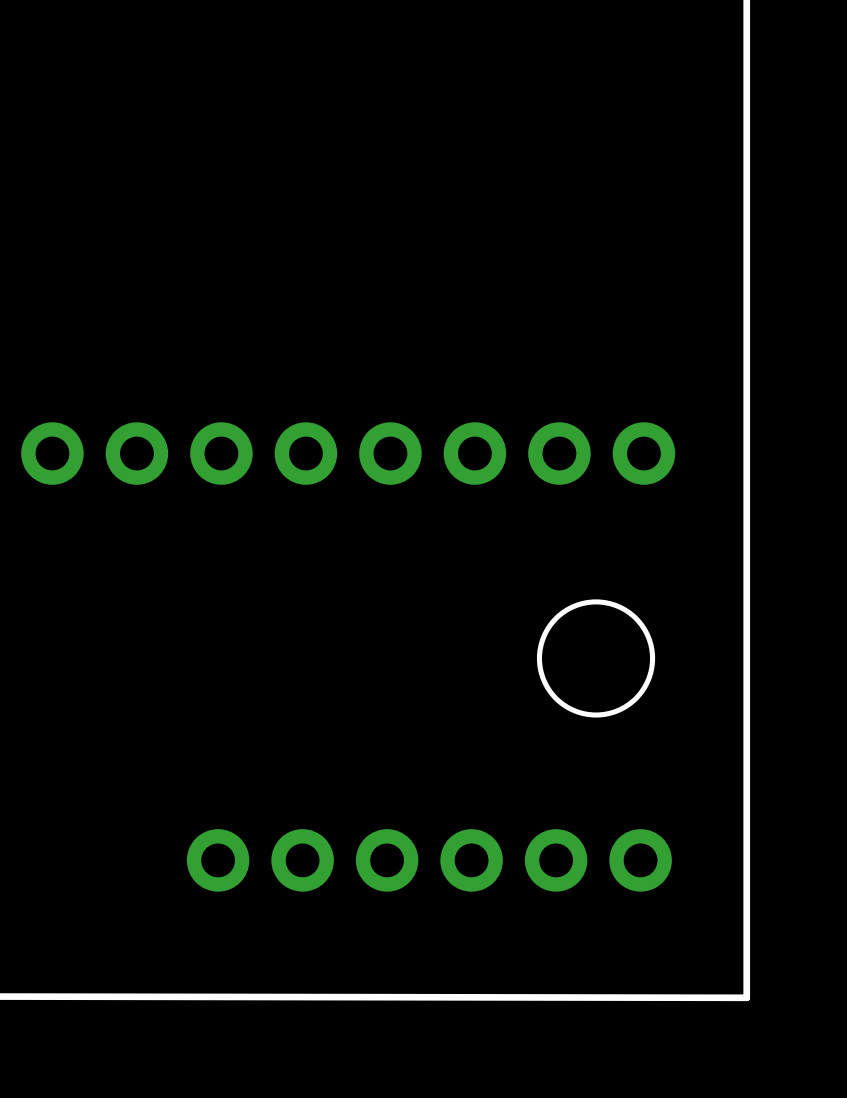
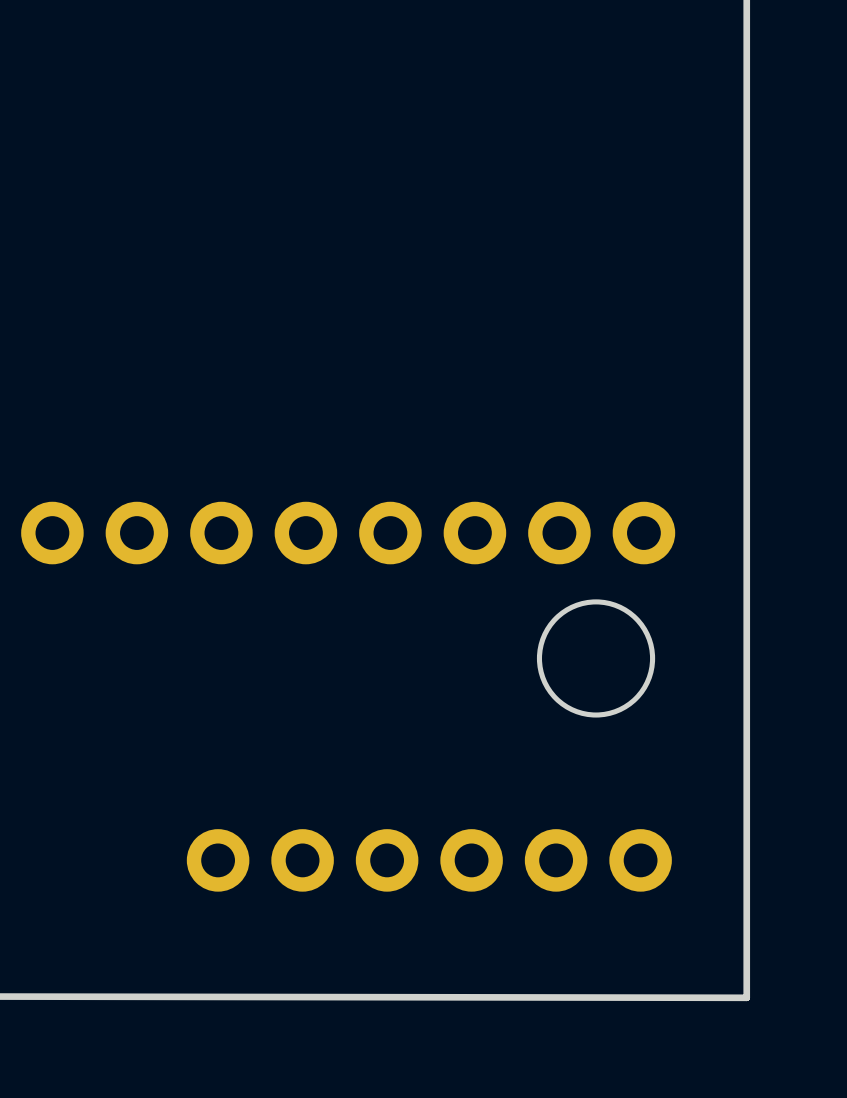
part position: (348, 453) -> (348, 533)

